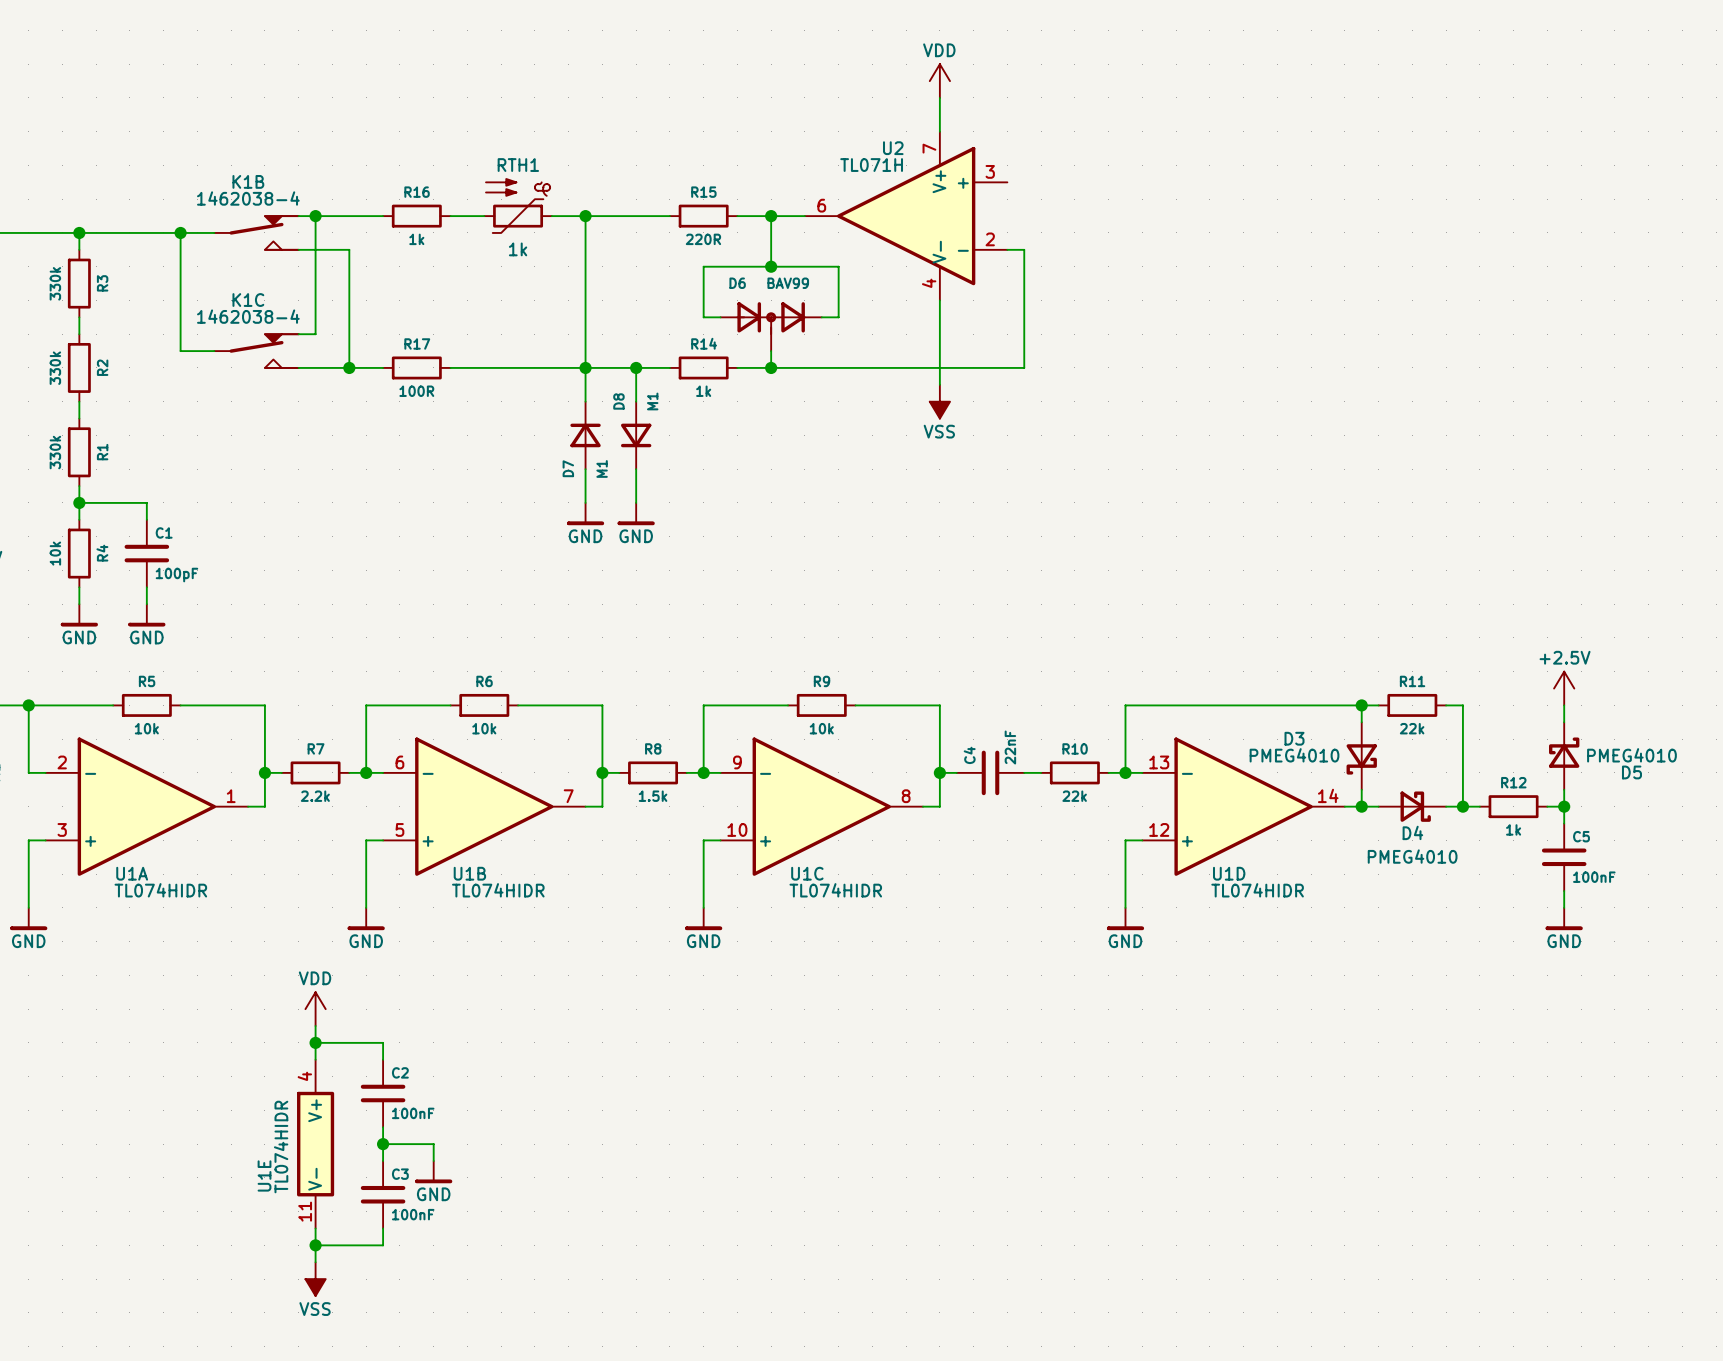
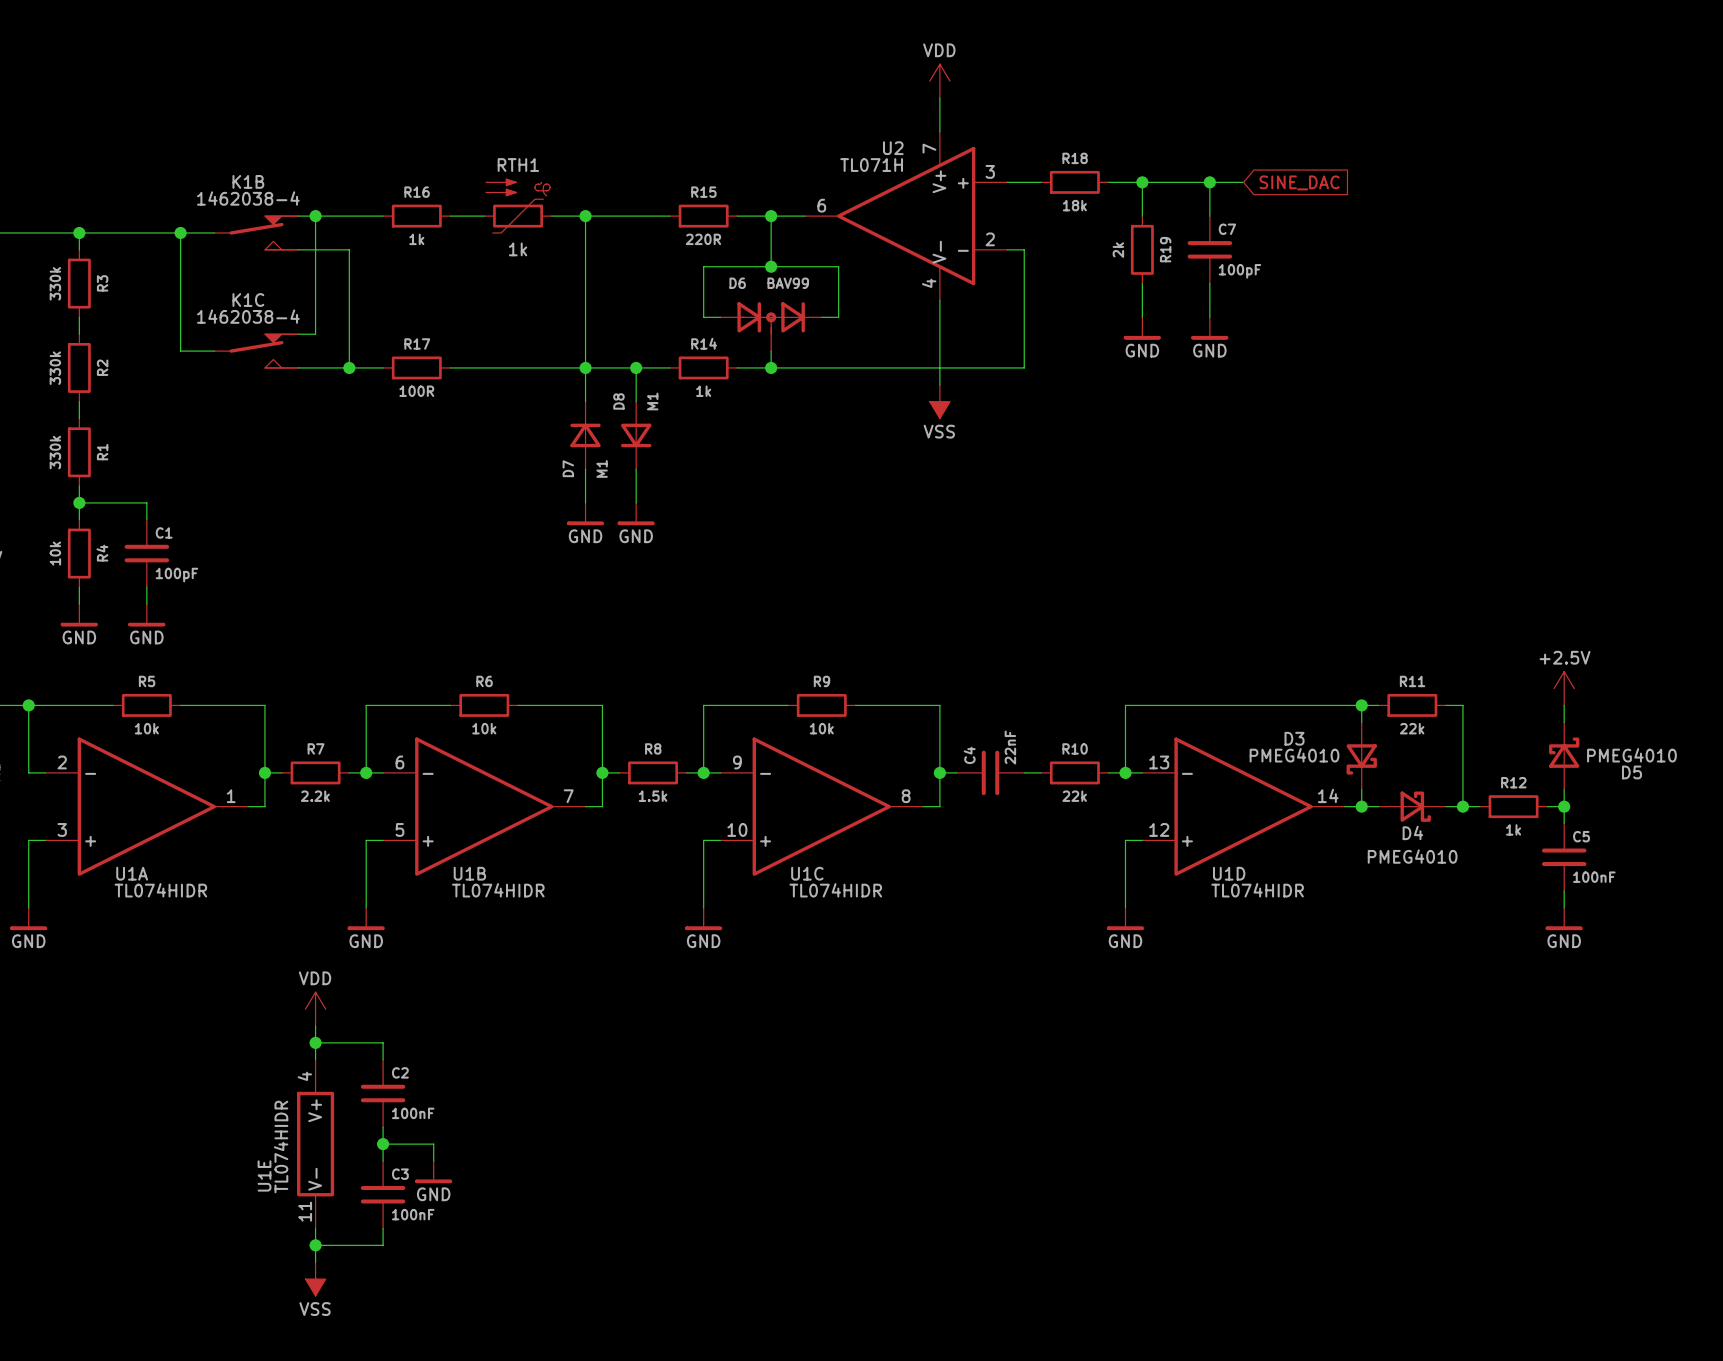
wire: none -> (1007, 182) (1041, 182)
R18: none -> 18k (1074, 182)
wire: none -> (1108, 182) (1243, 182)
wire: none -> (1142, 182) (1142, 216)
junction: none -> (1142, 182)
wire: none -> (1209, 182) (1209, 216)
junction: none -> (1209, 182)
global label: none -> SINE_DAC (1299, 182)
R19: none -> 2k (1142, 249)
C7: none -> 100pF (1209, 249)
wire: none -> (1142, 283) (1142, 317)
wire: none -> (1209, 283) (1209, 317)
power symbol: none -> GND (1142, 328)
power symbol: none -> GND (1209, 328)

